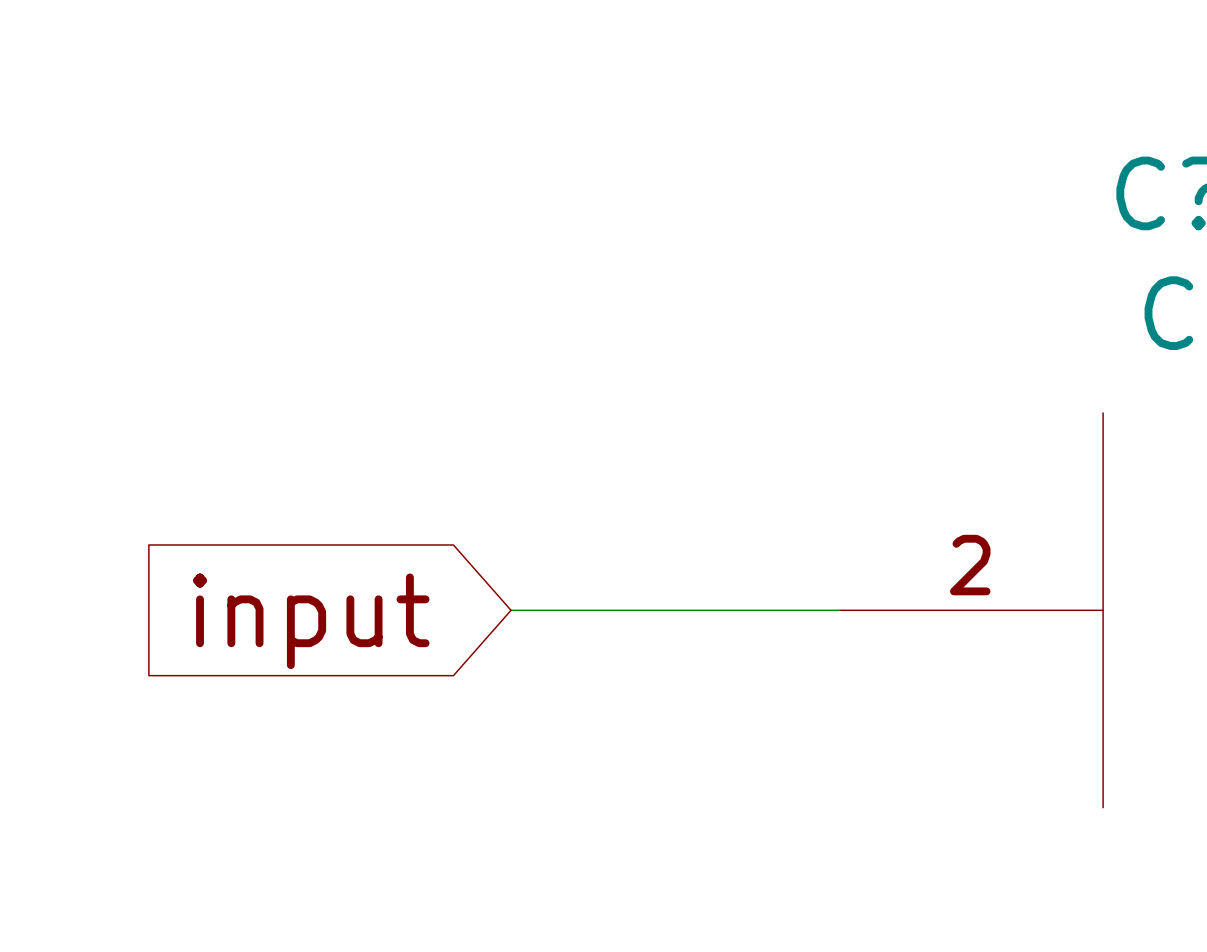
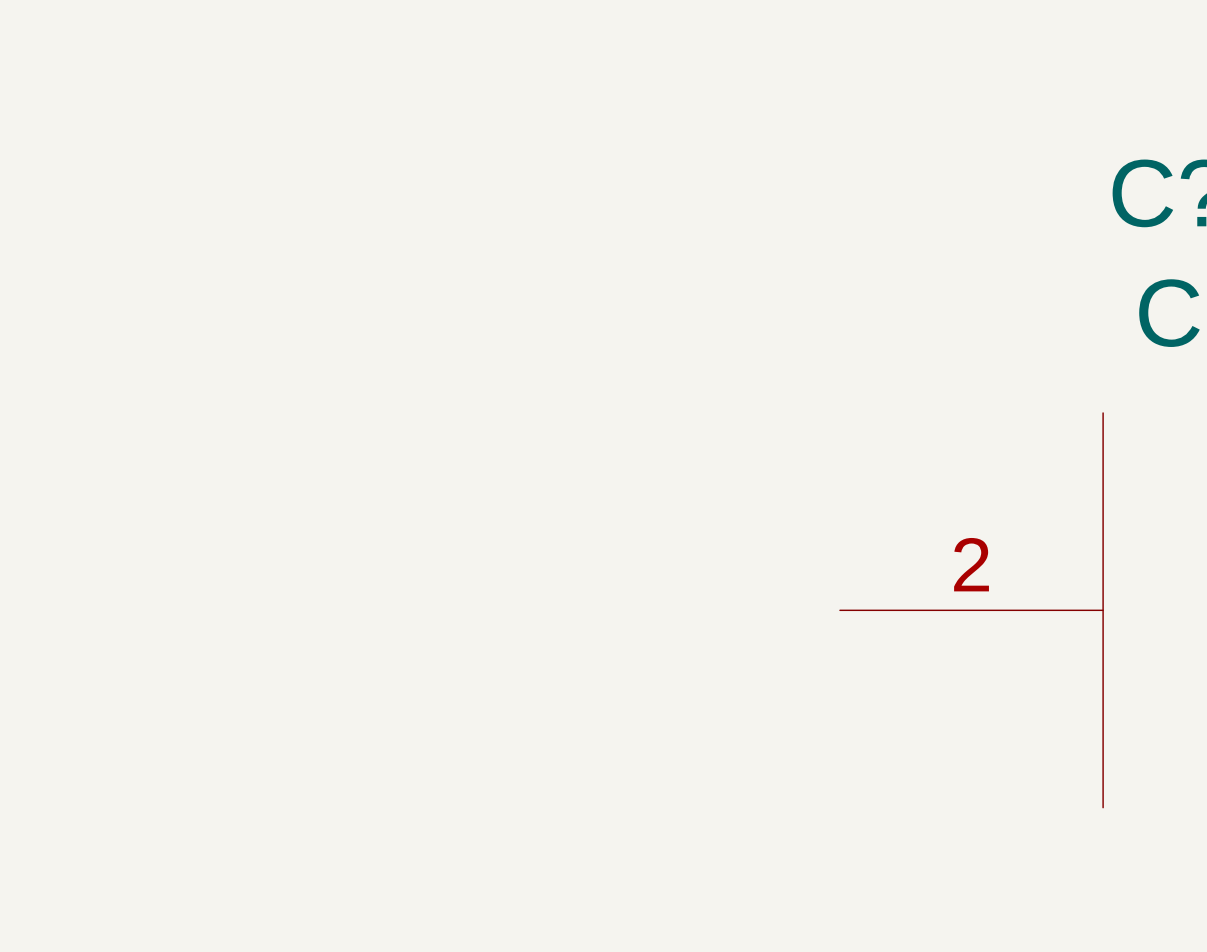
wire: (511, 610) (839, 610) -> none
global label: input (311, 621) -> none

